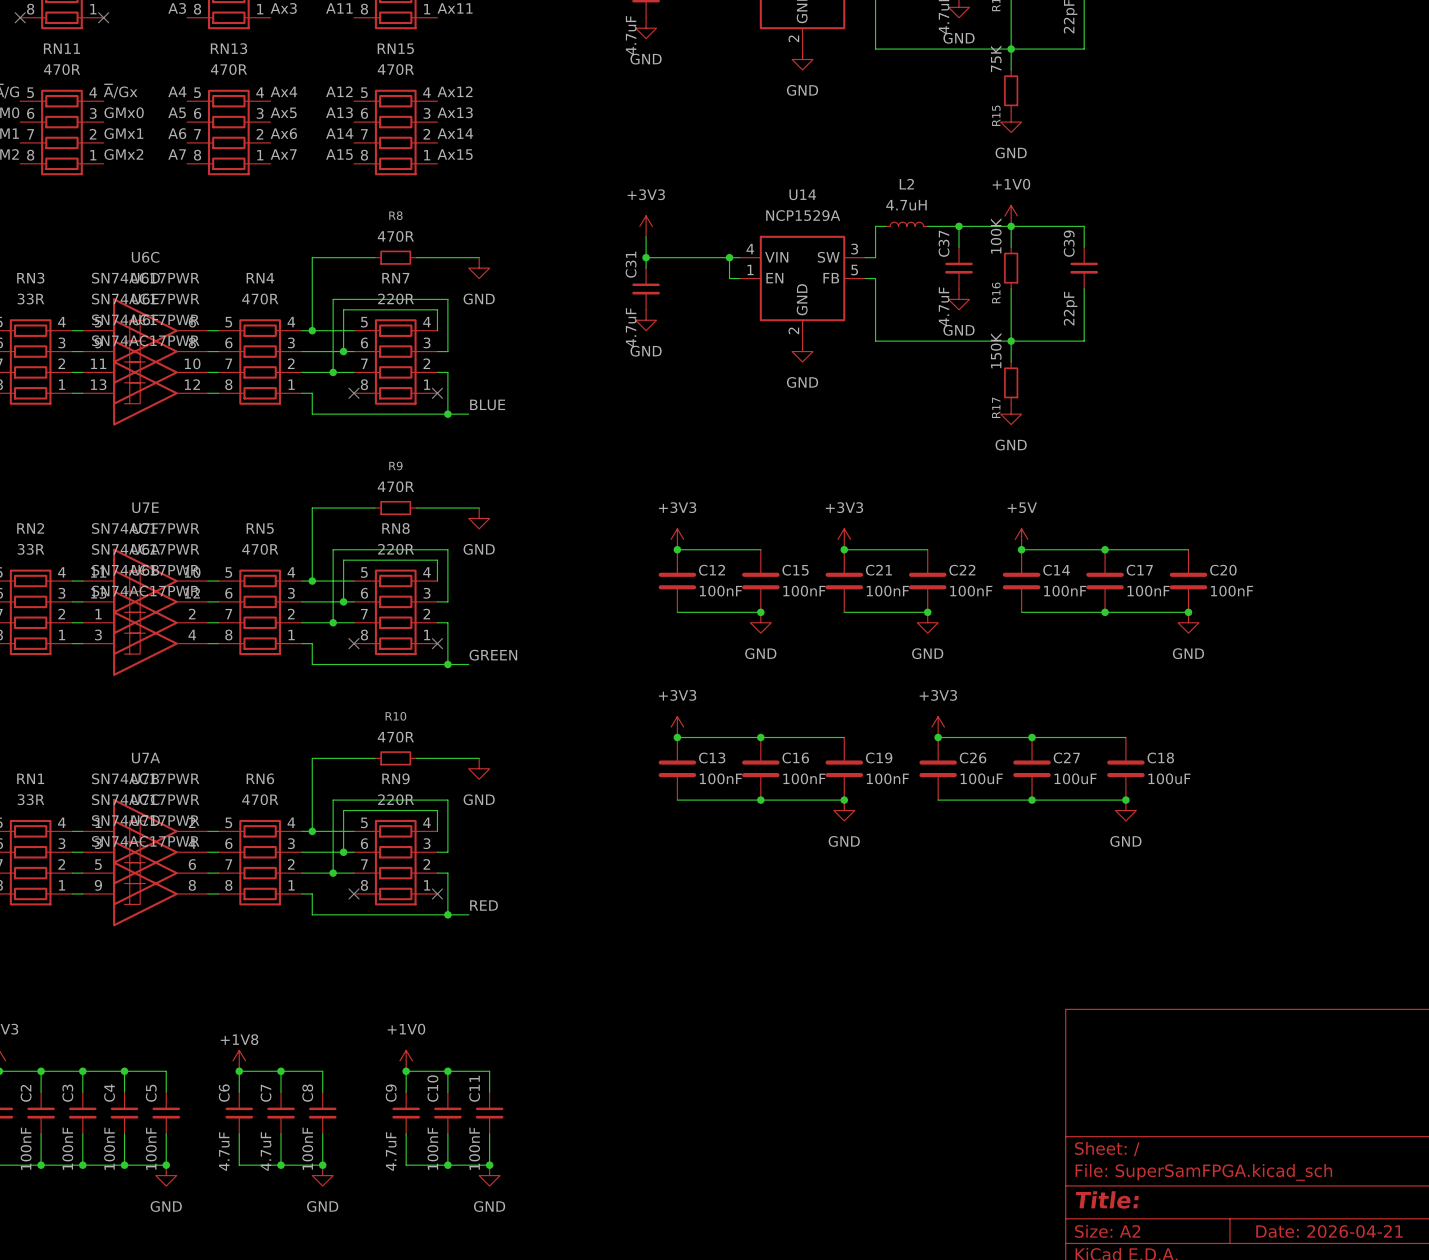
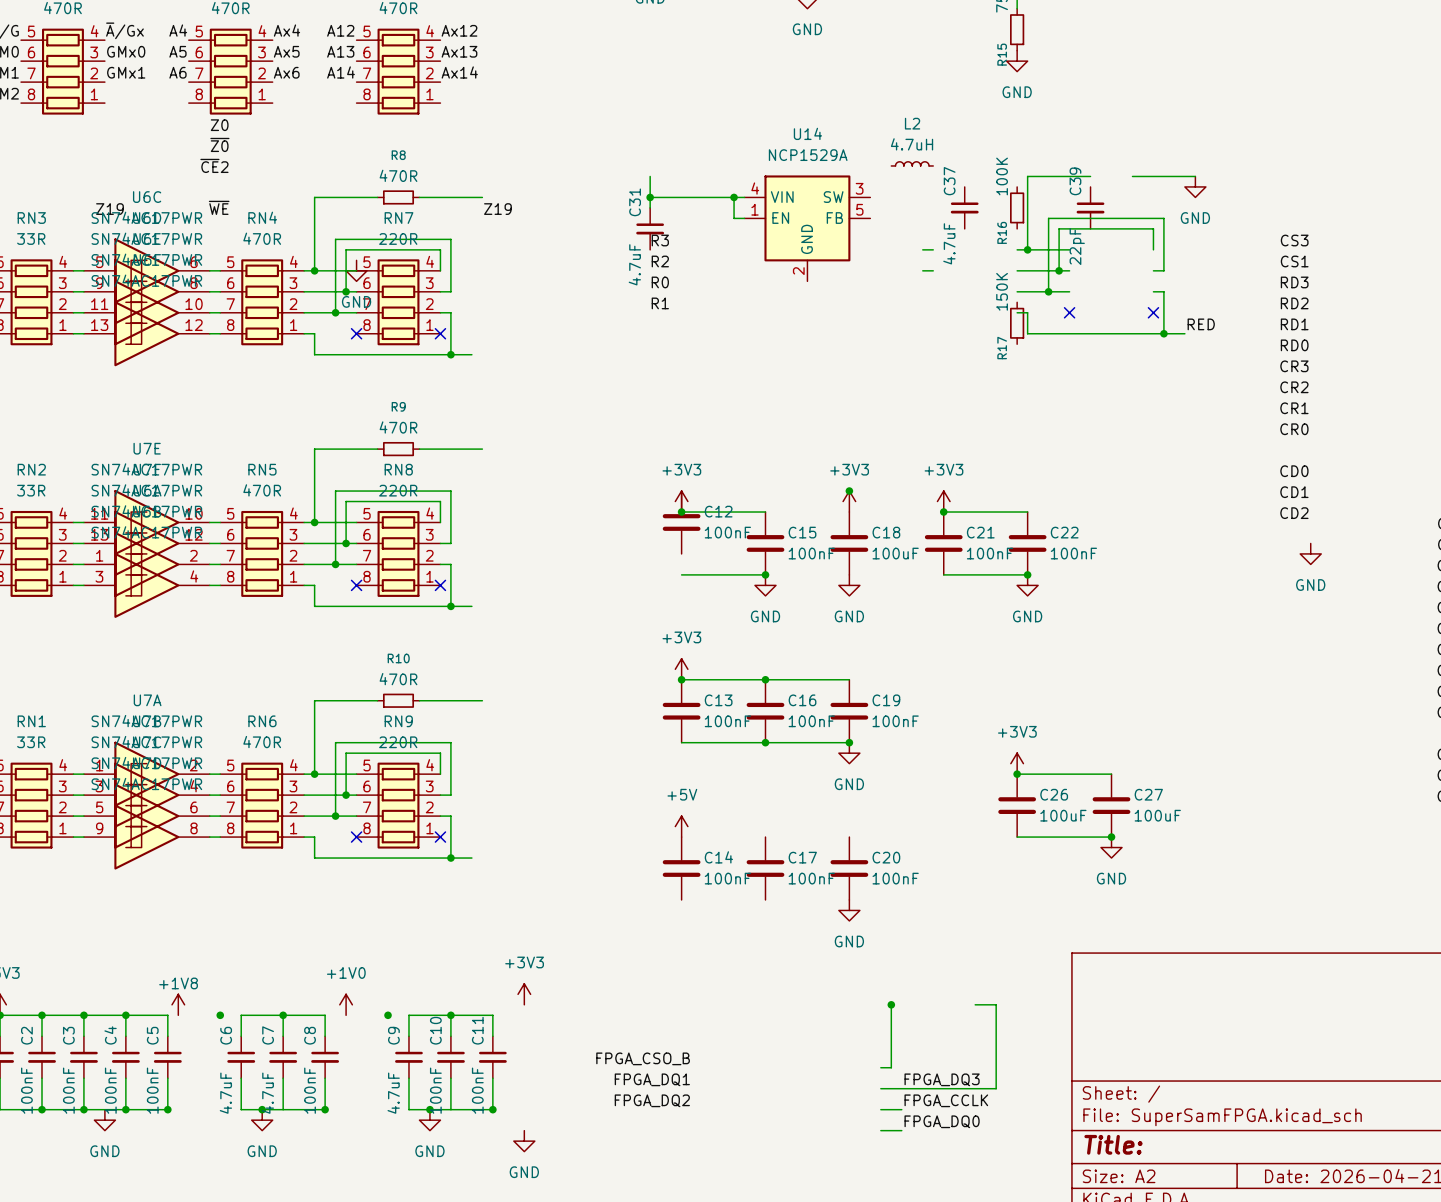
label: GMx2 (123, 154) -> none
label: A7 (177, 154) -> none
label: Ax7 (283, 154) -> none
label: A15 (339, 154) -> none
label: Ax15 (455, 154) -> none
label: none -> Z0 (219, 125)
label: none -> ~{Z0} (219, 144)
power symbol: +1V0 (1011, 215) -> none
label: none -> ~{CE}2 (214, 165)
power symbol: +3V3 (646, 226) -> none
wire: (885, 226) (875, 226) (875, 257) (865, 257) -> none
wire: (927, 226) (1084, 226) (1084, 247) -> none
wire: (959, 226) (959, 247) -> none
junction: (959, 226) -> none
wire: (1011, 226) (1011, 247) -> none
junction: (1011, 226) -> none
wire: none -> (1090, 176) (1027, 176) (1027, 249)
wire: none -> (1132, 176) (1195, 176)
power symbol: none -> GND (1195, 186)
label: none -> ~{WE} (219, 207)
power symbol: GND (479, 268) -> none
label: none -> Z19 (109, 209)
label: none -> Z19 (497, 209)
wire: (865, 278) (875, 278) (875, 341) (1084, 341) (1084, 288) -> none
wire: (1011, 288) (1011, 361) -> none
power symbol: GND (959, 299) -> none
label: none -> R3 (660, 240)
label: none -> CS3 (1294, 240)
wire: none -> (922, 249) (933, 249)
wire: none -> (1017, 249) (1069, 249)
junction: none -> (1027, 249)
wire: none -> (1153, 249) (1153, 228) (1059, 228) (1059, 270)
power symbol: GND (646, 320) -> none
label: none -> R2 (660, 261)
label: none -> CS1 (1294, 261)
power symbol: none -> GND (356, 270)
wire: none -> (922, 270) (933, 270)
wire: none -> (1017, 270) (1069, 270)
junction: none -> (1059, 270)
wire: none -> (1153, 270) (1163, 270) (1163, 218) (1048, 218) (1048, 291)
junction: (1011, 341) -> none
label: none -> R0 (660, 282)
label: none -> RD3 (1294, 282)
power symbol: GND (802, 351) -> none
wire: none -> (1017, 291) (1069, 291)
junction: none -> (1048, 291)
wire: none -> (1153, 291) (1163, 291) (1163, 333)
label: none -> R1 (660, 303)
label: none -> RD2 (1294, 303)
wire: none -> (1017, 312) (1027, 312) (1027, 333) (1184, 333)
no-connect mark: none -> (1069, 312)
no-connect mark: none -> (1153, 312)
label: none -> RED (1201, 324)
label: none -> RD1 (1294, 324)
junction: none -> (1163, 333)
label: BLUE (487, 404) -> none
label: none -> RD0 (1294, 345)
power symbol: GND (1011, 414) -> none
label: none -> CR3 (1294, 366)
label: none -> CR2 (1294, 387)
label: none -> CR1 (1294, 408)
label: none -> CR0 (1294, 429)
power symbol: GND (479, 518) -> none
label: none -> CD0 (1294, 471)
power symbol position: +3V3 (677, 539) -> +3V3 (681, 501)
power symbol position: +3V3 (844, 539) -> +3V3 (849, 501)
power symbol: +5V (1021, 539) -> none
wire: (677, 549) (760, 549) -> (681, 512) (765, 512)
junction position: (677, 549) -> (681, 512)
wire: (844, 549) (927, 549) -> (943, 512) (1027, 512)
wire: (1021, 549) (1188, 549) -> none
junction: (1021, 549) -> none
junction: (1105, 549) -> none
label: none -> CD1 (1294, 492)
power symbol: none -> +3V3 (943, 501)
junction: none -> (943, 512)
label: none -> CD2 (1294, 513)
C15 position: (760, 581) -> (765, 543)
C21 position: (844, 581) -> (943, 543)
C22 position: (927, 581) -> (1027, 543)
C14 position: (1021, 581) -> (681, 868)
C17 position: (1105, 581) -> (765, 868)
C20 position: (1188, 581) -> (849, 868)
wire: (677, 612) (760, 612) -> (681, 574) (765, 574)
junction position: (760, 612) -> (765, 574)
wire: (844, 612) (927, 612) -> (943, 574) (1027, 574)
junction: (927, 612) -> none
wire: (1021, 612) (1188, 612) -> none
junction: (1105, 612) -> none
junction: (1188, 612) -> none
power symbol: none -> GND (1310, 553)
power symbol position: GND (760, 622) -> GND (765, 585)
power symbol: GND (927, 622) -> none
power symbol: GND (1188, 622) -> none
junction: none -> (1027, 574)
power symbol: none -> GND (849, 585)
power symbol: none -> GND (1027, 585)
label: GREEN (493, 655) -> none
power symbol: +3V3 (938, 727) -> none
wire: (938, 737) (1125, 737) -> none
junction: (938, 737) -> none
junction: (1032, 737) -> none
power symbol: GND (479, 768) -> none
C26 position: (938, 768) -> (1017, 805)
C27 position: (1032, 768) -> (1111, 805)
C18 position: (1125, 768) -> (849, 543)
wire: (938, 800) (1125, 800) -> none
junction position: (1032, 800) -> (1017, 774)
junction: (1125, 800) -> none
power symbol position: GND (1125, 810) -> GND (1111, 847)
power symbol: none -> +3V3 (1017, 763)
wire: none -> (1017, 774) (1111, 774)
power symbol: none -> +5V (681, 826)
wire: none -> (1017, 837) (1111, 837)
junction: none -> (1111, 837)
label: RED (484, 905) -> none
power symbol: none -> GND (849, 910)
power symbol: none -> +3V3 (524, 994)
power symbol position: +1V8 (239, 1060) -> +1V8 (178, 1004)
power symbol position: +1V0 (406, 1060) -> +1V0 (346, 1004)
wire: none -> (891, 1004) (891, 1067) (880, 1067)
junction: none -> (891, 1004)
wire: none -> (975, 1004) (996, 1004) (996, 1088) (880, 1088)
junction position: (239, 1071) -> (220, 1015)
junction position: (406, 1071) -> (388, 1015)
label: none -> FPGA_CSO_B (643, 1058)
label: none -> FPGA_DQ1 (652, 1079)
label: none -> FPGA_DQ3 (942, 1079)
label: none -> FPGA_DQ2 (652, 1100)
label: none -> FPGA_CCLK (946, 1100)
junction position: (280, 1165) -> (262, 1109)
junction position: (447, 1165) -> (429, 1109)
wire: none -> (880, 1109) (901, 1109)
power symbol: none -> GND (104, 1120)
power symbol: GND (166, 1175) -> none
power symbol: none -> GND (262, 1120)
power symbol: GND (322, 1175) -> none
power symbol: none -> GND (429, 1120)
power symbol: GND (489, 1175) -> none
label: none -> FPGA_DQ0 (942, 1121)
wire: none -> (880, 1130) (901, 1130)
power symbol: none -> GND (524, 1141)

